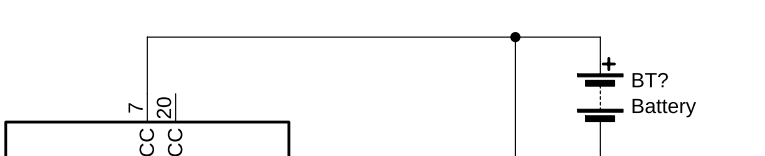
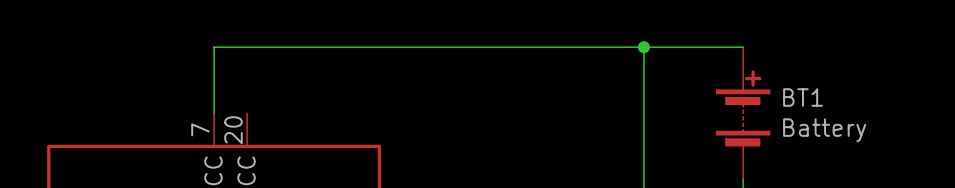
BT? name: BT? (650, 80) -> BT1 (802, 97)

